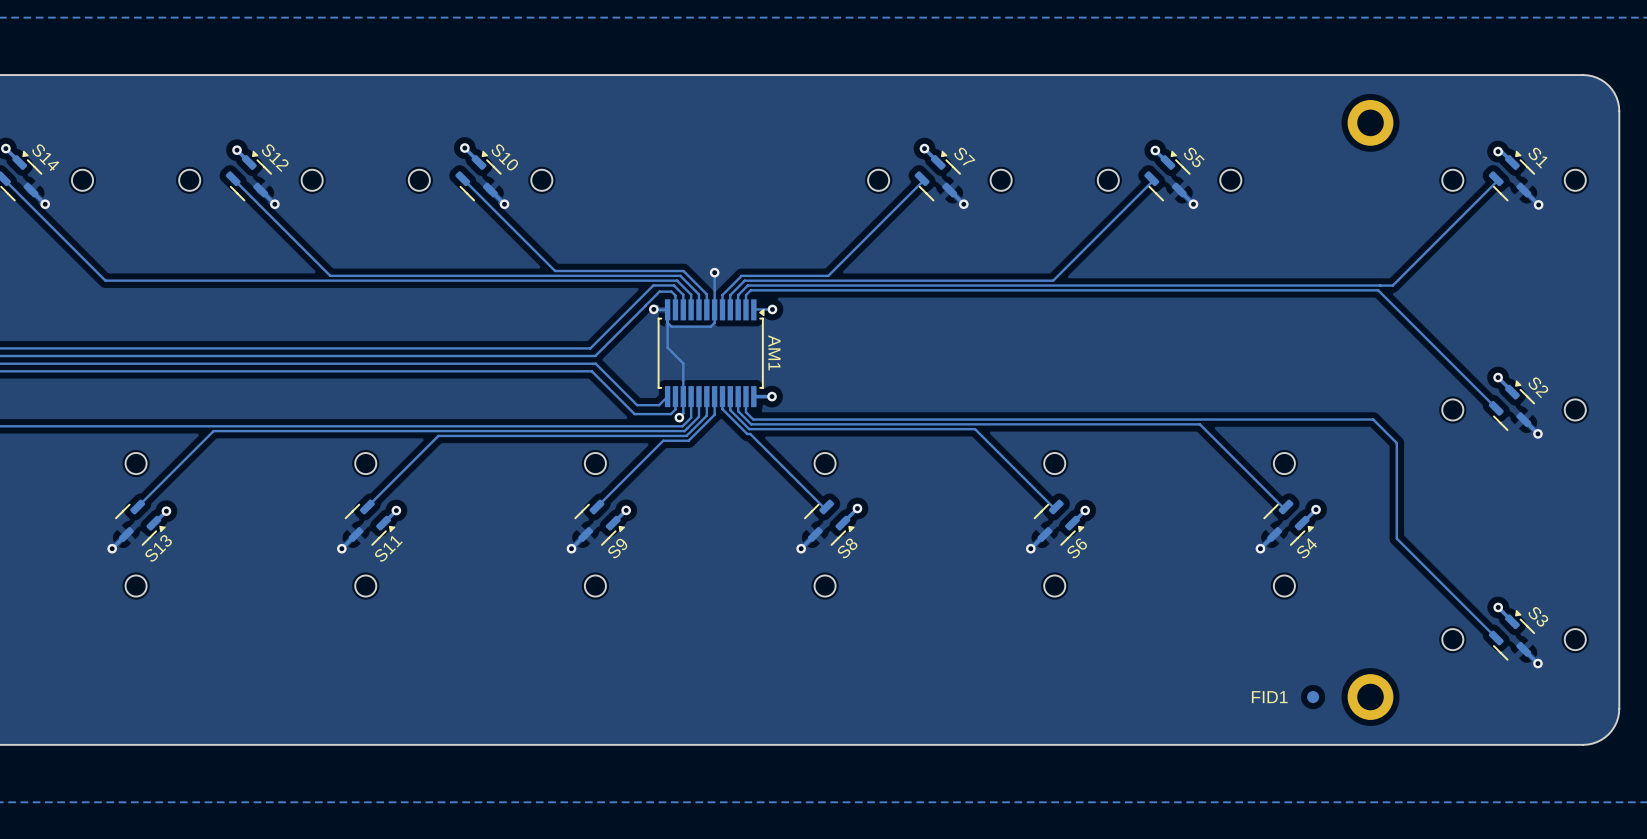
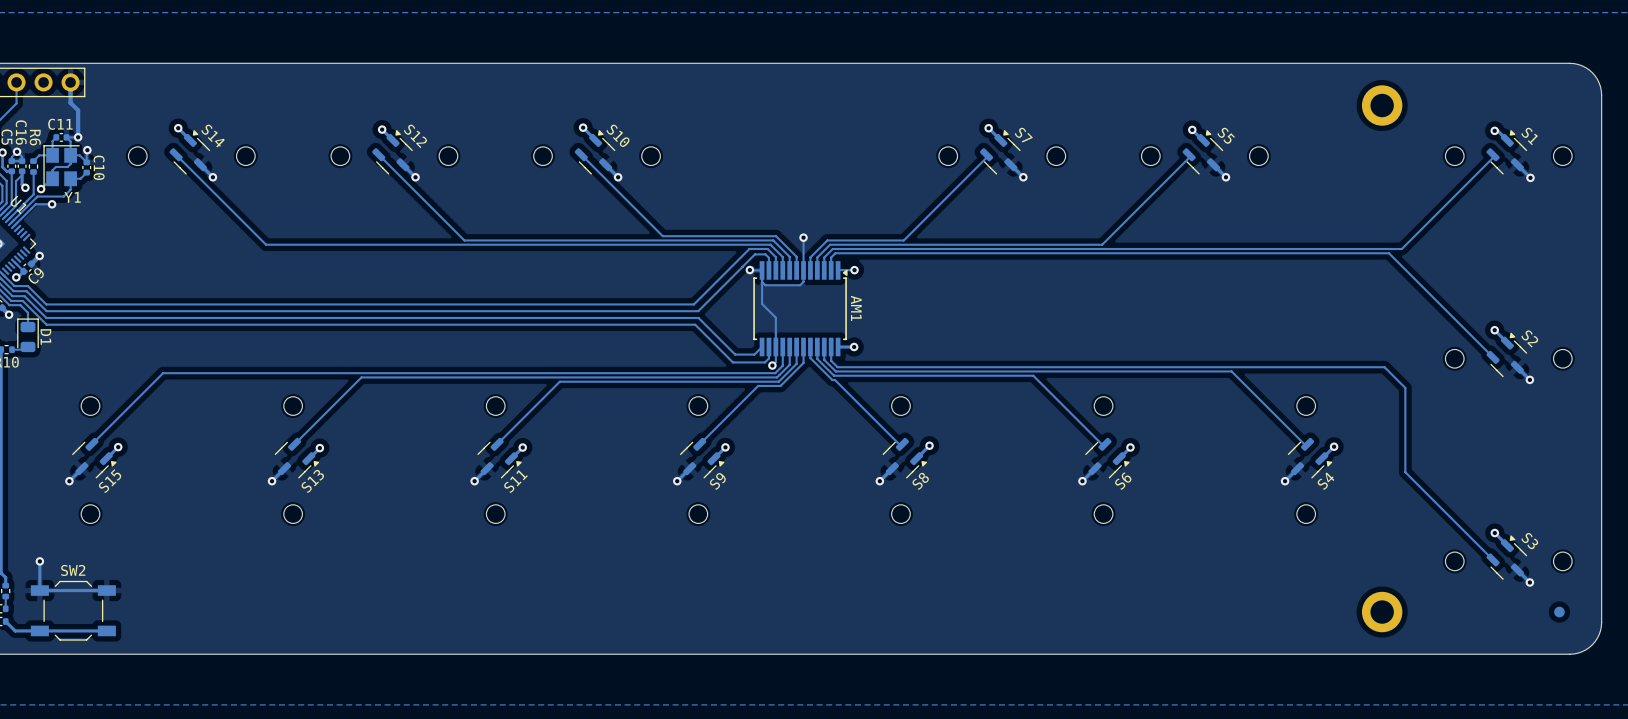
FID1: (1313, 697) -> none
part: none -> (1559, 612)

